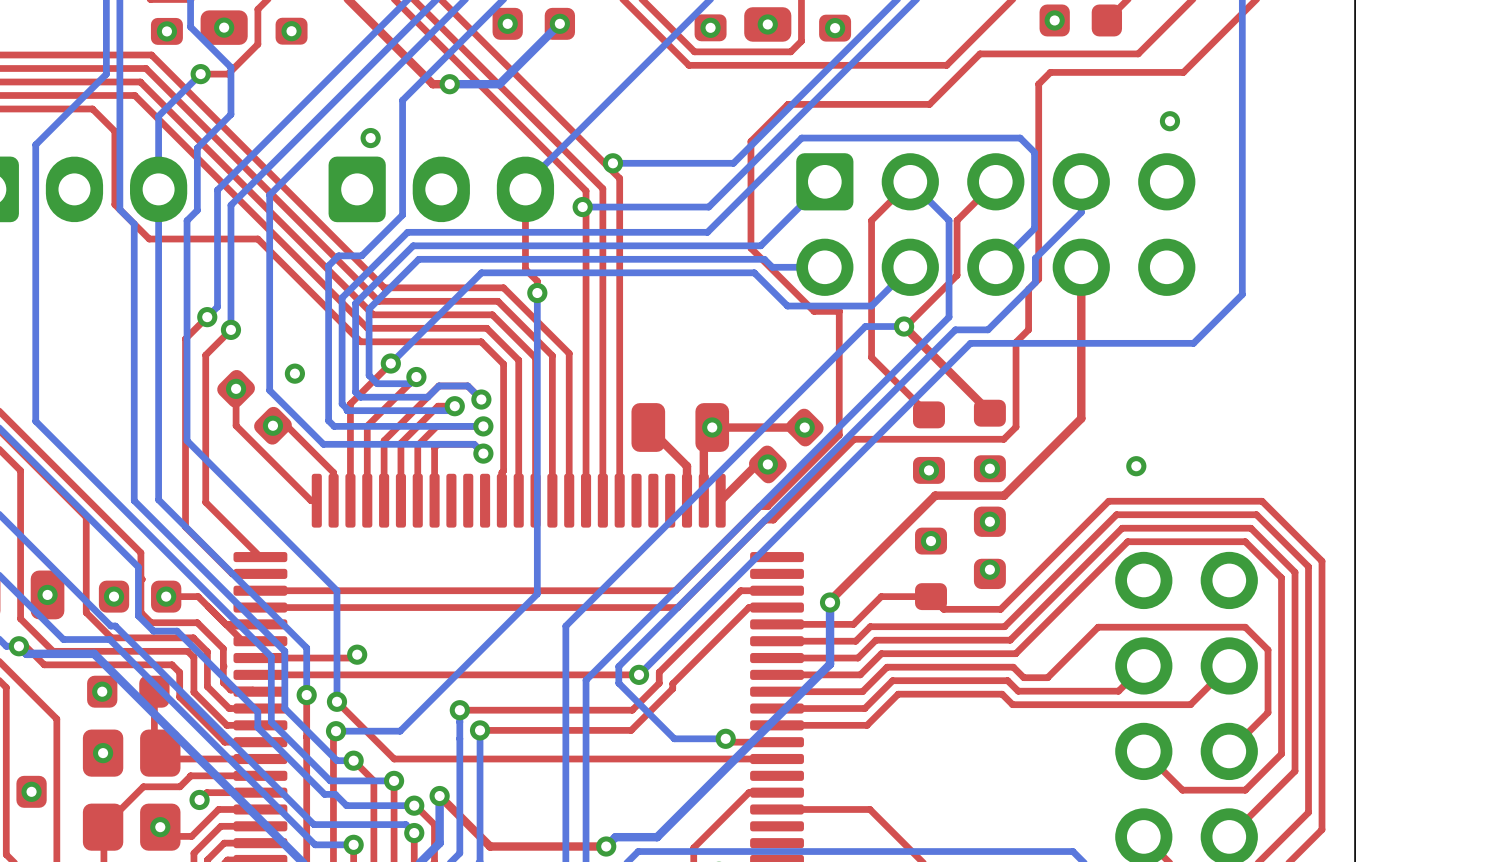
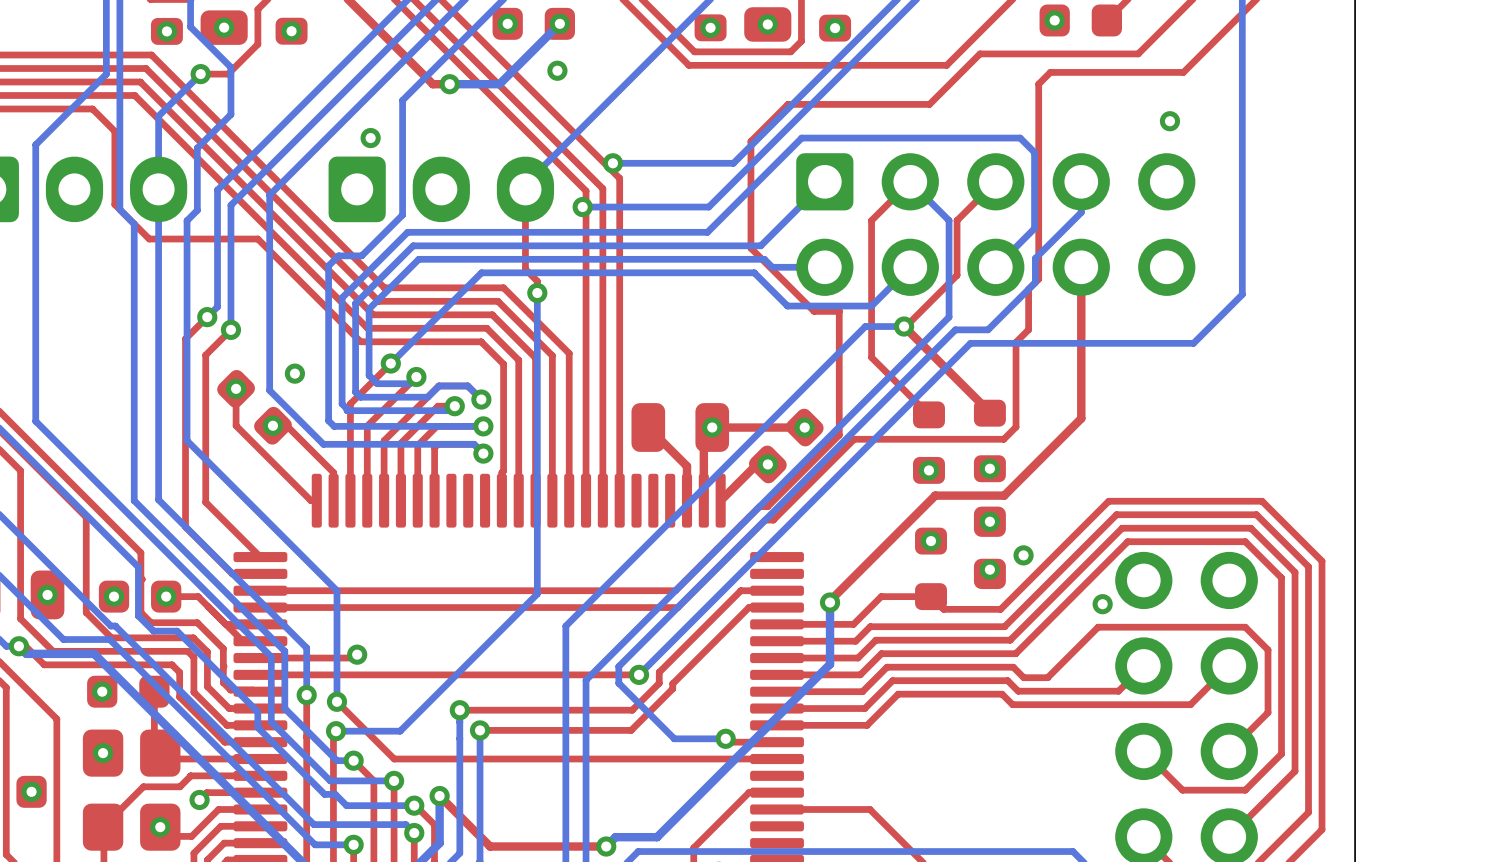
via: none -> (557, 70)
via: (1136, 466) -> none
via: none -> (1023, 555)
via: none -> (1102, 604)

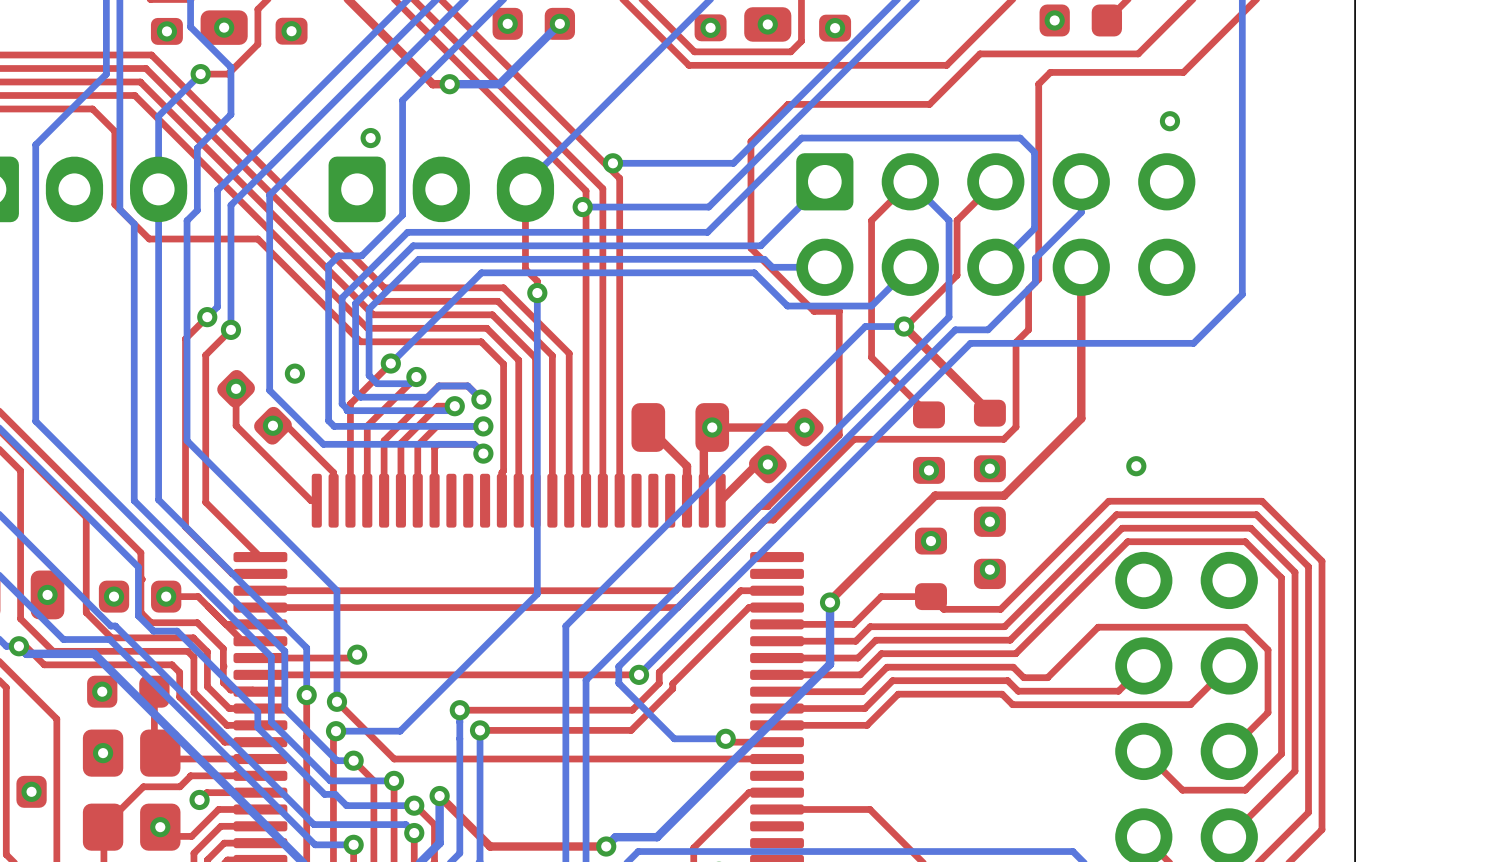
via: (557, 70) -> none
via: none -> (1136, 466)
via: (1023, 555) -> none
via: (1102, 604) -> none

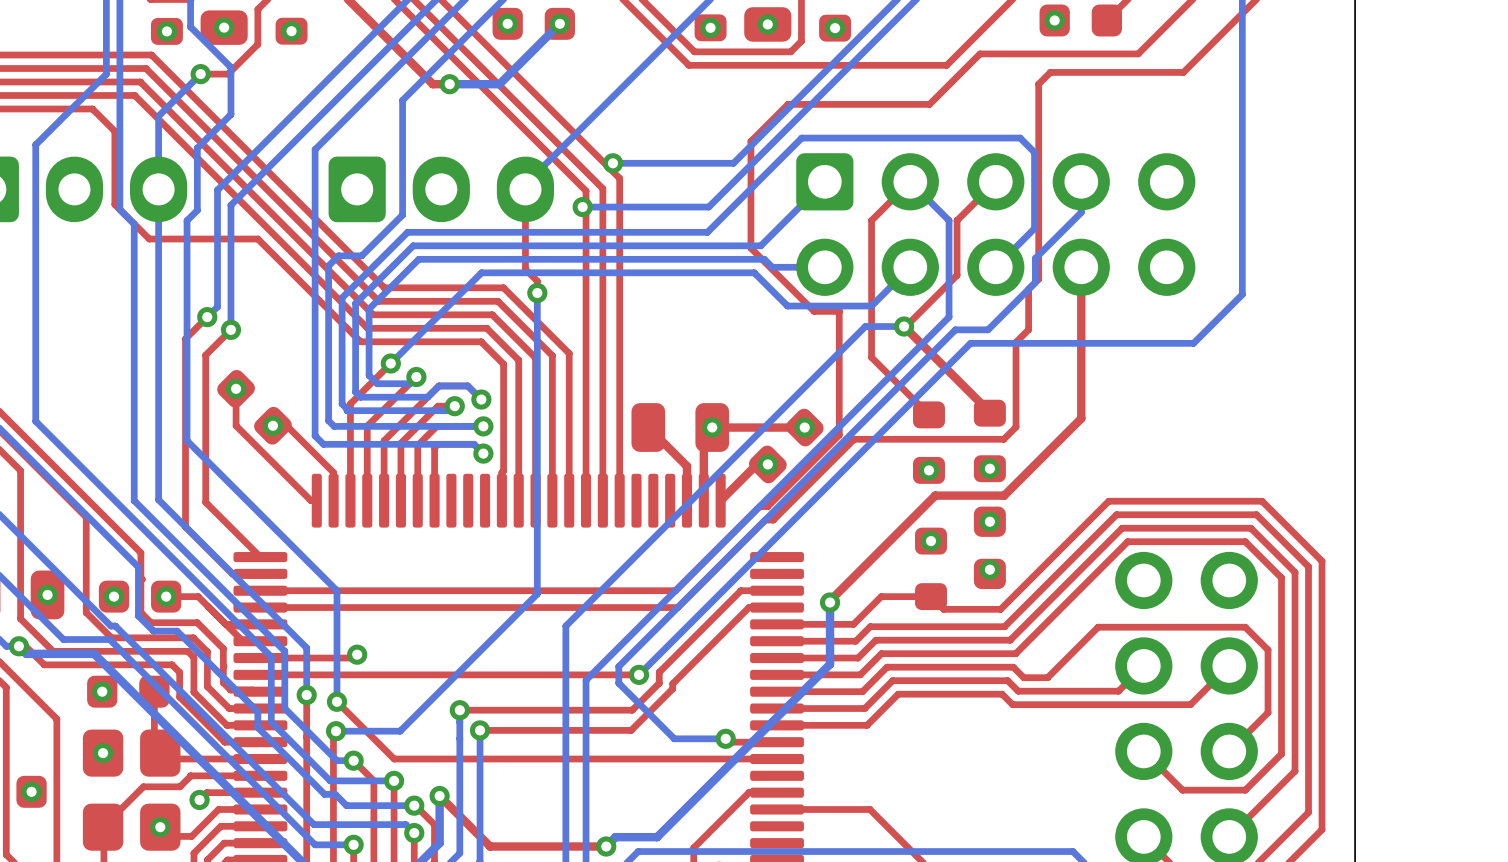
via: (1169, 121) -> none
via: (370, 138) -> none
bottom track: (315, 149) (269, 195) (269, 390) (315, 435) -> (315, 149) (315, 435)
via: (294, 373) -> none
via: (1136, 466) -> none

